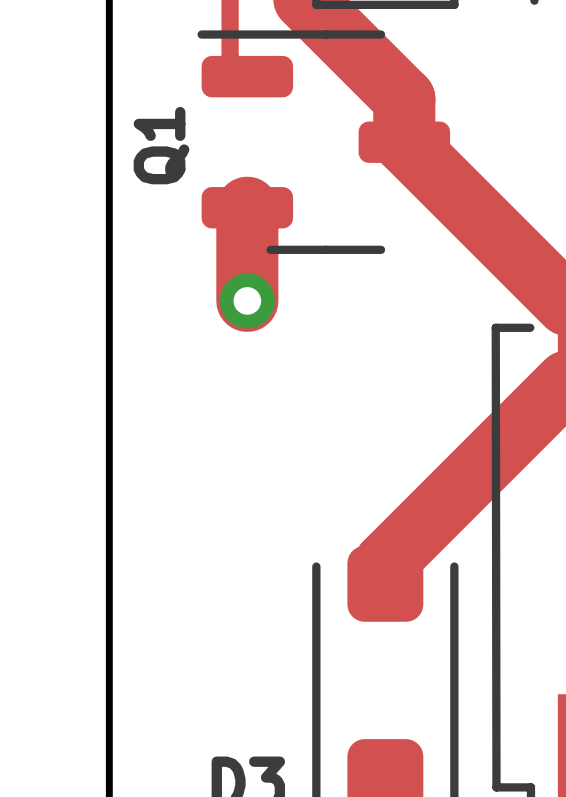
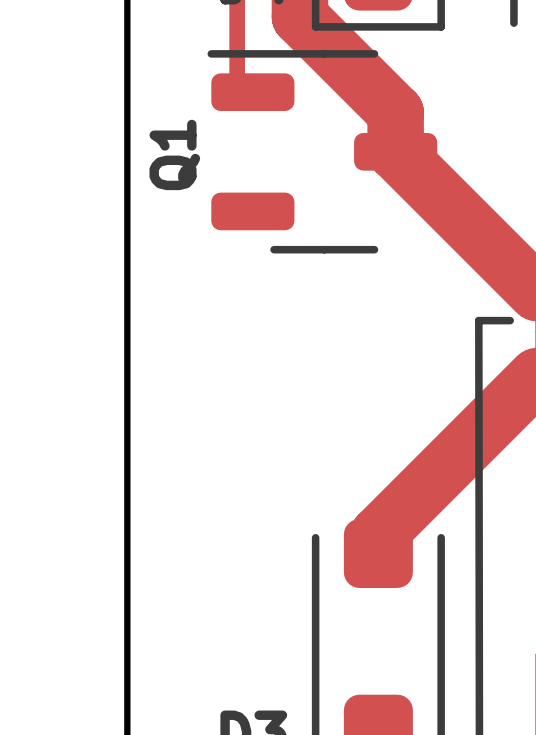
track: (247, 207) (247, 300) -> none
via: (247, 300) -> none

